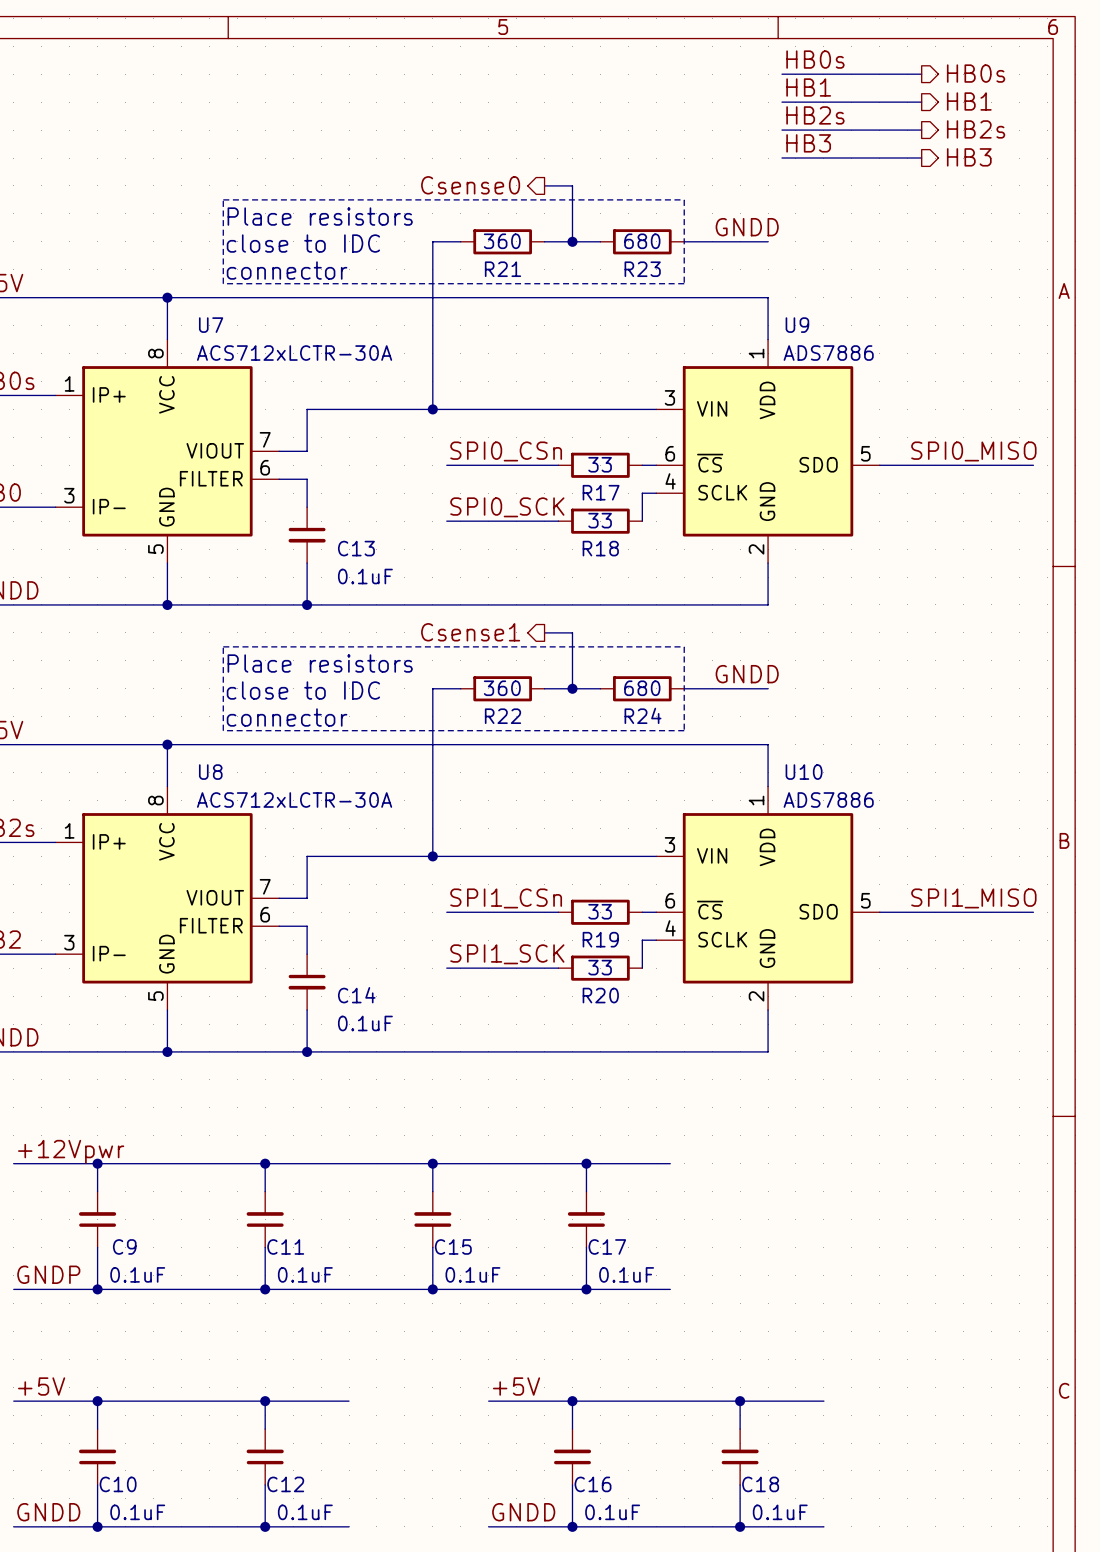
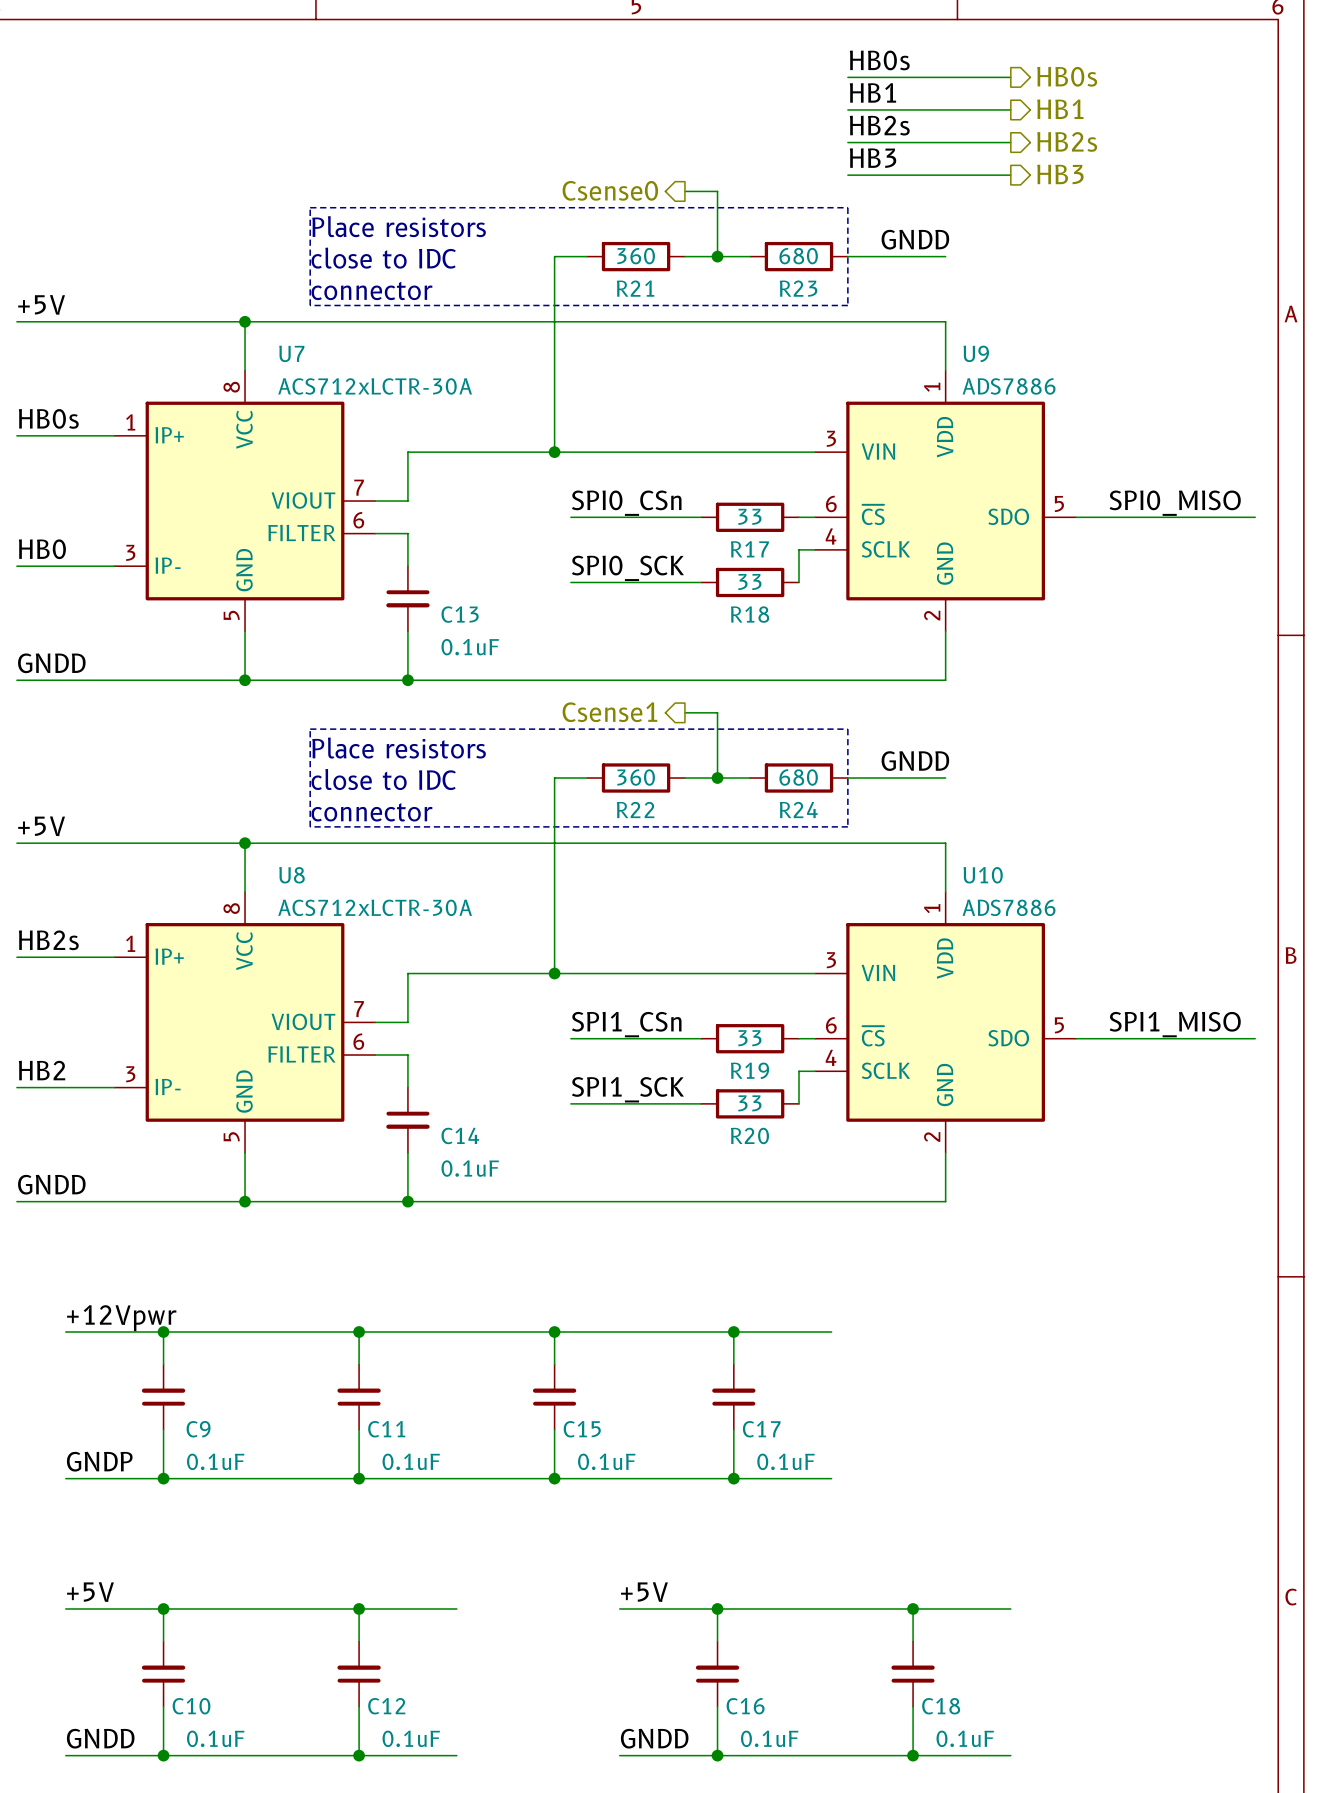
label position: HB0s (815, 59) -> HB0s (879, 60)
hierarchical label position: HB0s (976, 73) -> HB0s (1067, 76)
wire: (782, 74) (921, 74) -> (847, 77) (1010, 77)
label position: HB1 (808, 87) -> HB1 (872, 92)
hierarchical label position: HB1 (969, 101) -> HB1 (1060, 109)
wire: (782, 102) (921, 102) -> (847, 109) (1010, 109)
label position: HB2s (815, 115) -> HB2s (879, 125)
hierarchical label position: HB2s (976, 129) -> HB2s (1067, 141)
wire: (782, 130) (921, 130) -> (847, 142) (1010, 142)
label position: HB3 (808, 143) -> HB3 (873, 158)
hierarchical label position: HB3 (969, 157) -> HB3 (1060, 174)
wire: (782, 158) (921, 158) -> (847, 175) (1010, 175)

